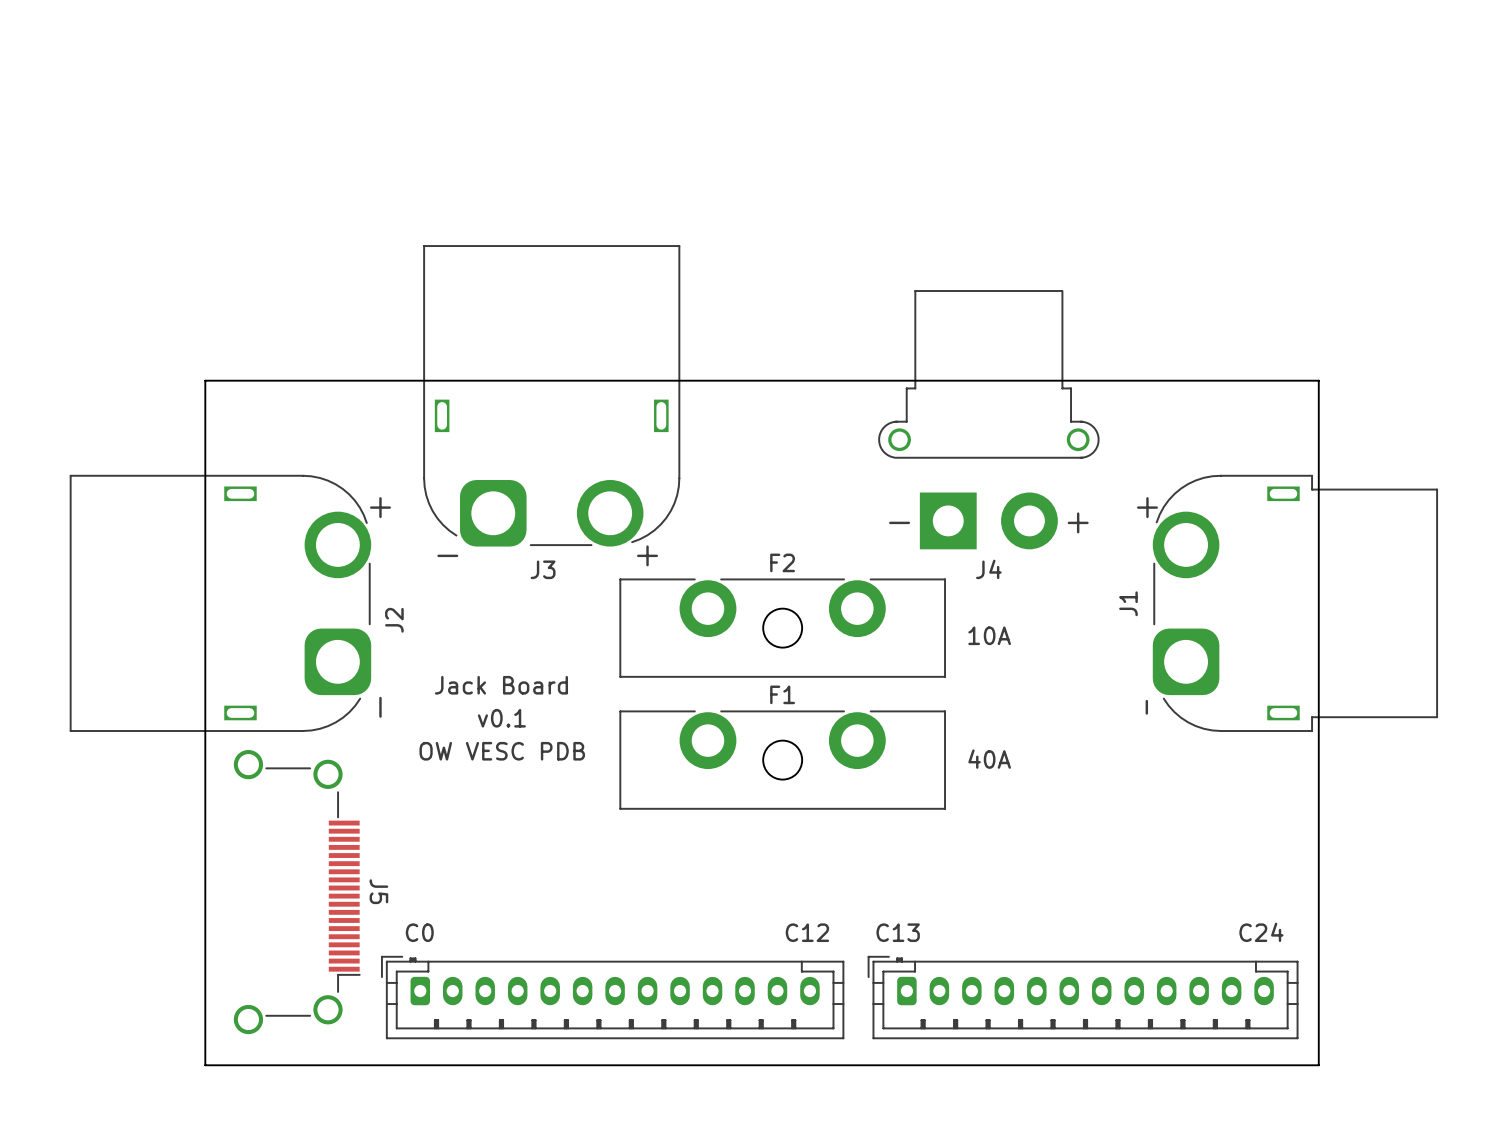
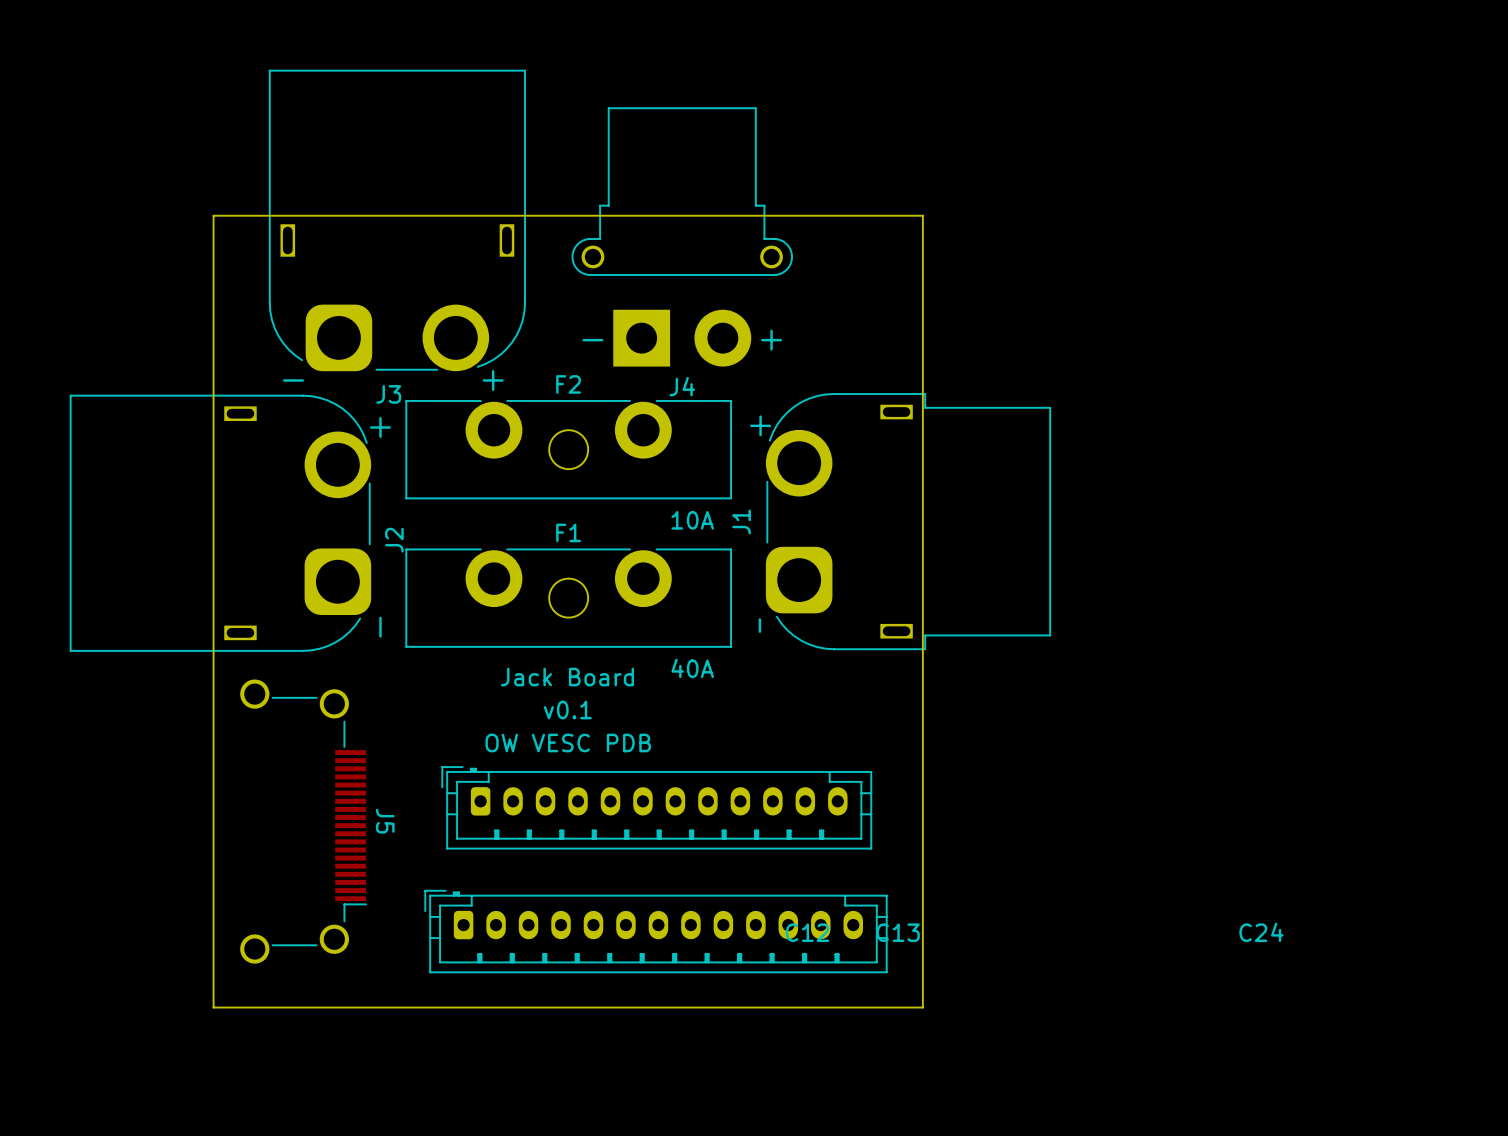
board edge: (205, 380) (1318, 380) (1318, 1065) (205, 1065) (205, 380) -> (213, 215) (213, 1007) (922, 1007) (922, 215) (213, 215)
J3 position: (551, 395) -> (397, 220)
J4 position: (988, 419) -> (682, 236)
J2 position: (220, 603) -> (220, 523)
J1 position: (1295, 603) -> (908, 521)
F2 position: (782, 628) -> (568, 449)
text position: 10A (989, 635) -> 10A (692, 520)
text position: Jack Board (501, 685) -> Jack Board (567, 677)
text position: v0.1 (501, 718) -> v0.1 (567, 710)
text position: OW VESC PDB (502, 751) -> OW VESC PDB (568, 743)
text position: 40A (989, 759) -> 40A (692, 668)
F1 position: (782, 760) -> (568, 598)
part: none -> (656, 807)
J5 position: (297, 892) -> (303, 821)
text: C0 (419, 932) -> none
part position: (612, 997) -> (655, 931)
part: (1083, 997) -> none

